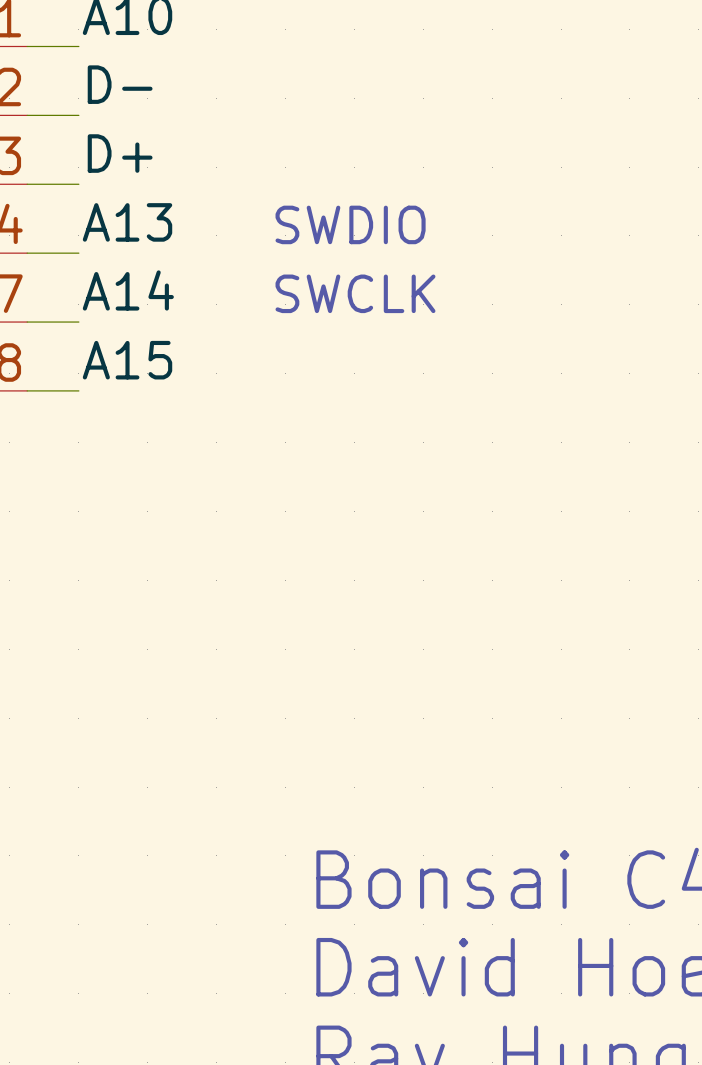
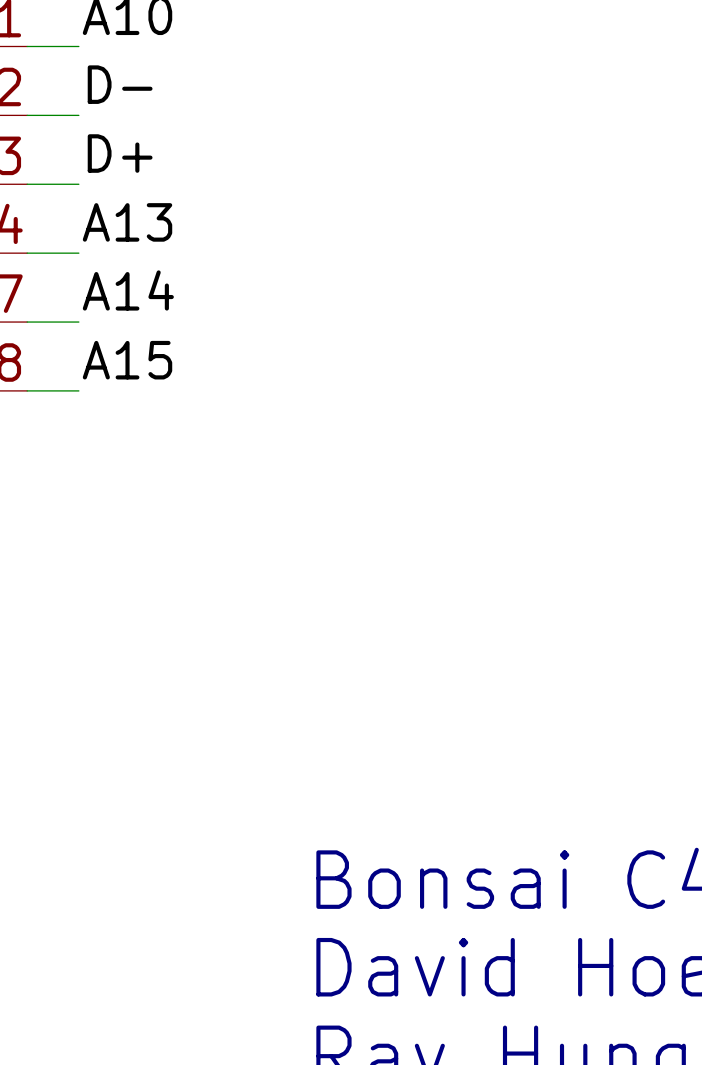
text: SWDIO (350, 224) -> none
text: SWCLK (355, 293) -> none

